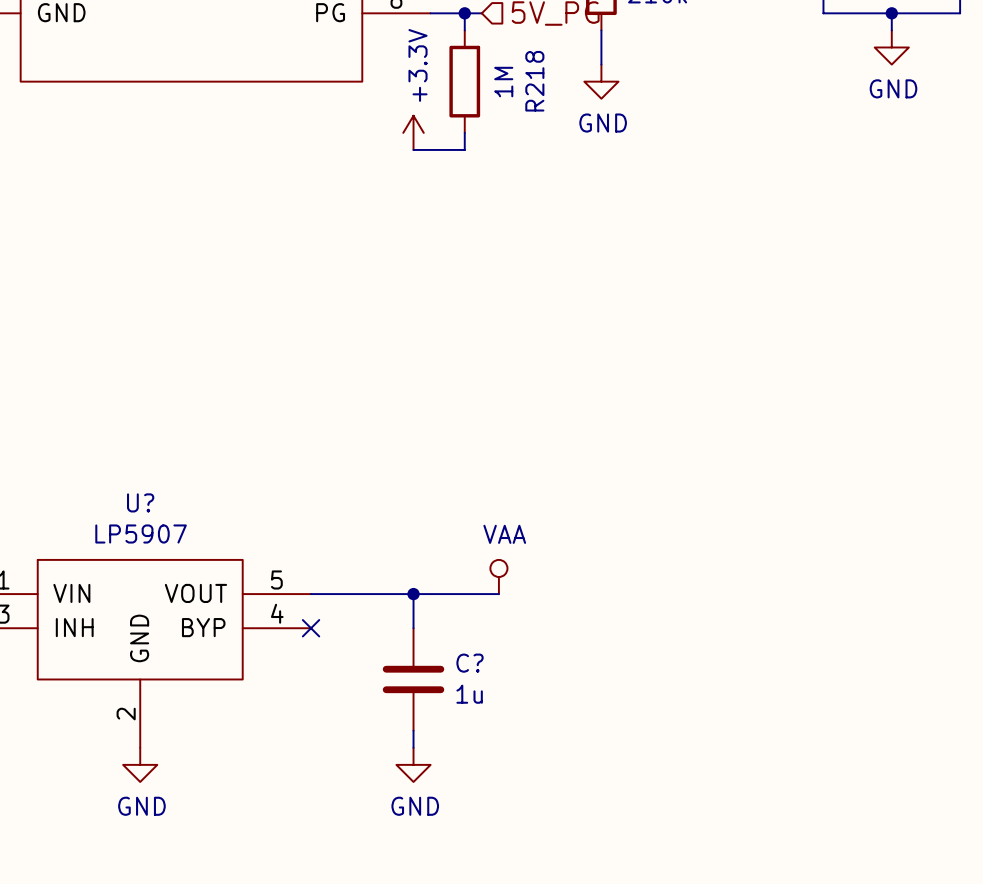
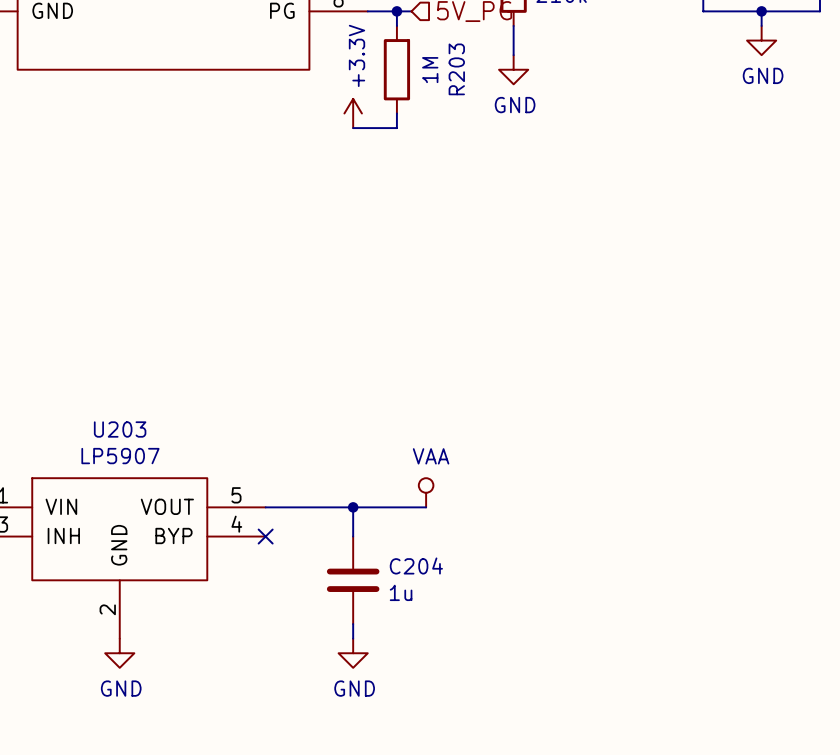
R218 name: R218 (534, 81) -> R203 (456, 69)
U? name: U? (140, 502) -> U203 (120, 429)
C? name: C? (470, 663) -> C204 (416, 565)

